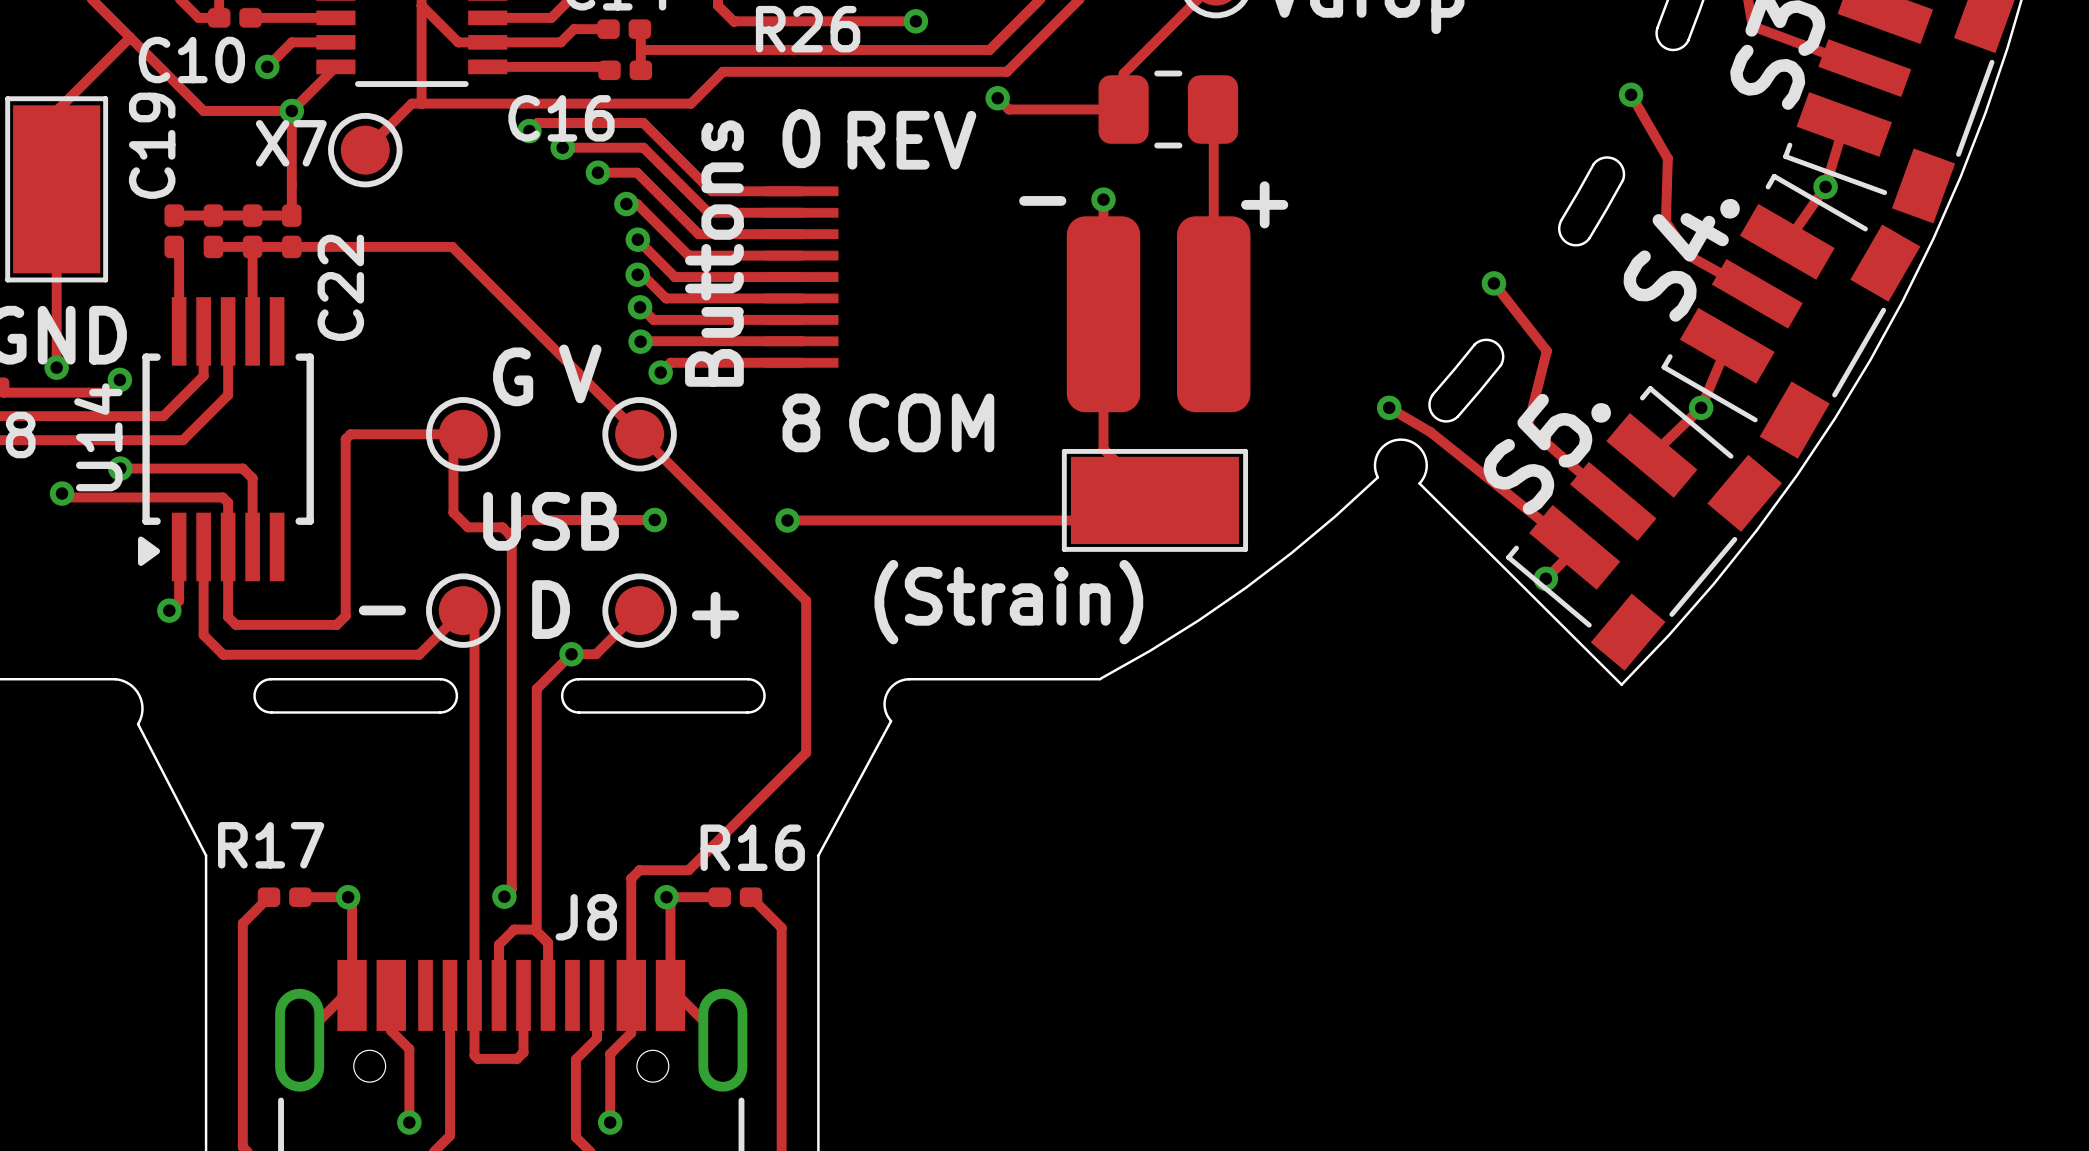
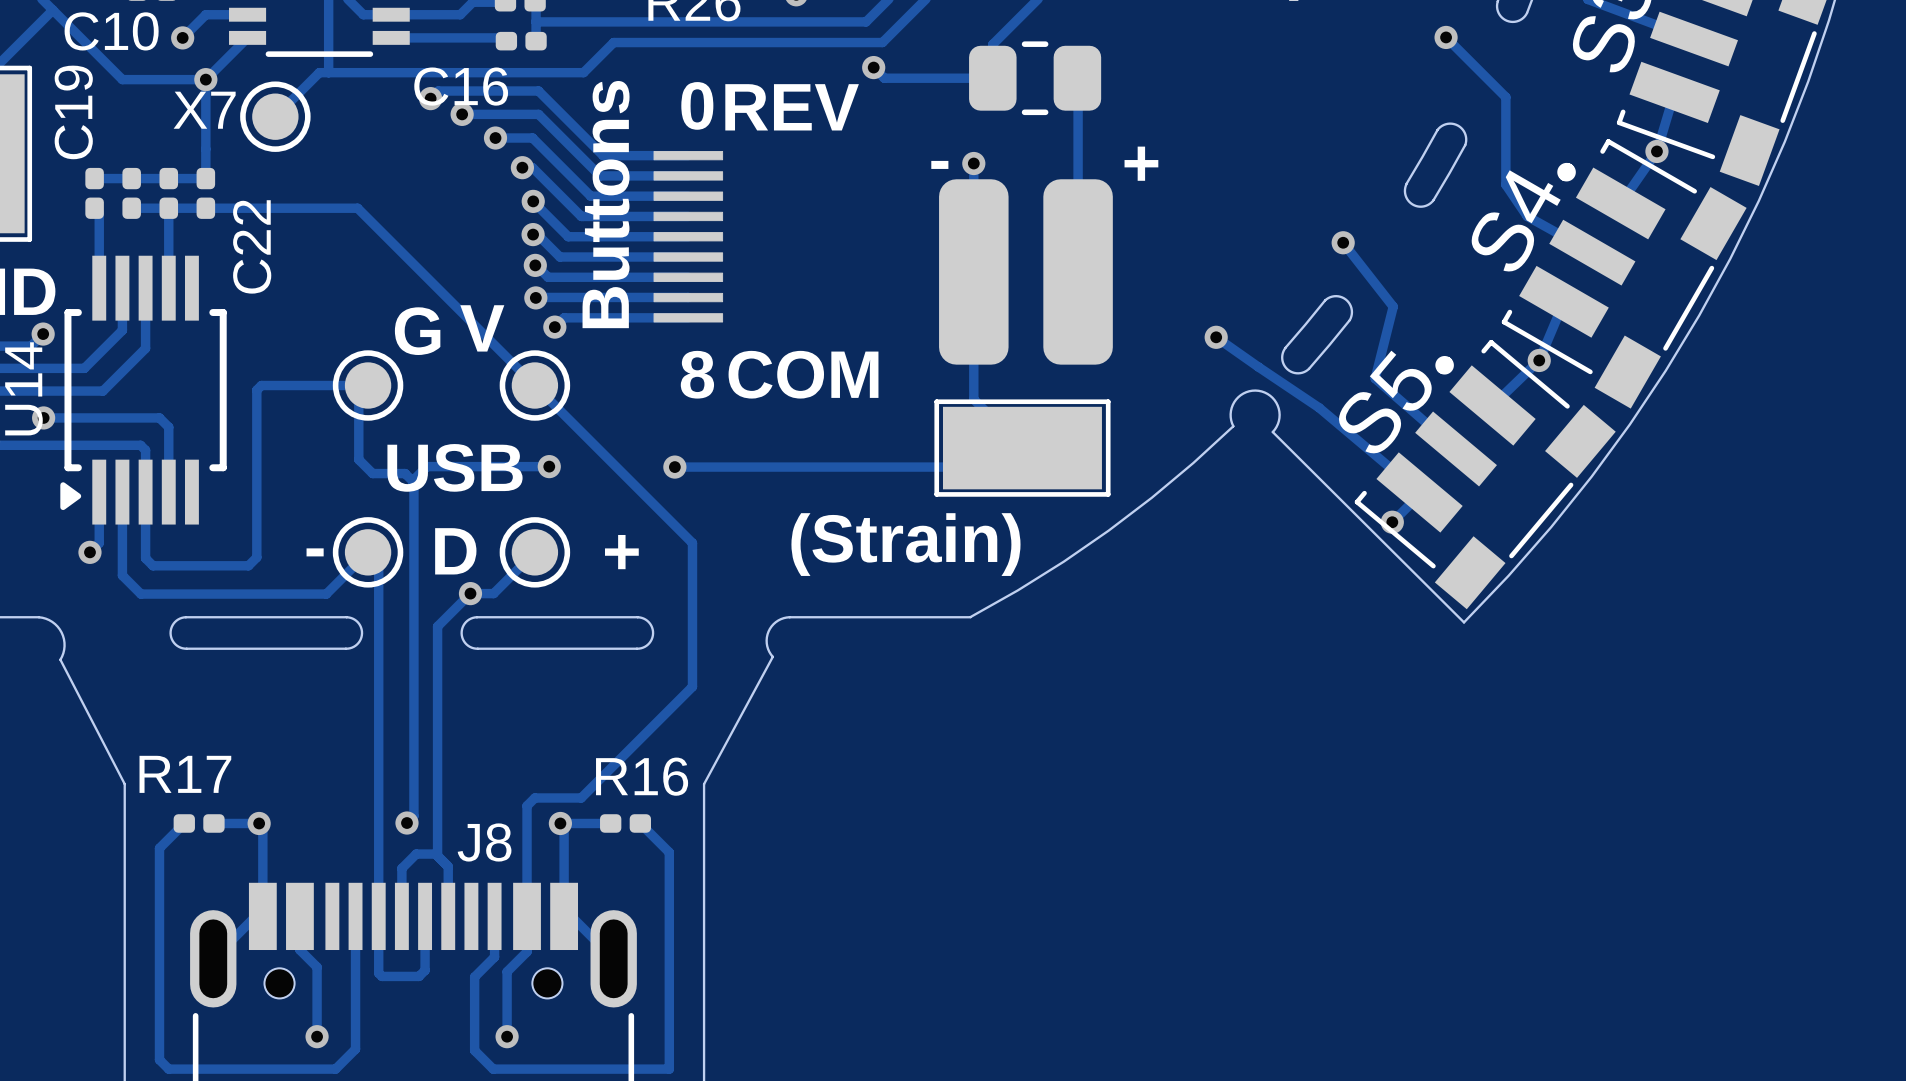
track: (1631, 94) (1667, 158) (1665, 222) -> (1446, 37) (1505, 97) (1505, 184)
via position: (1631, 94) -> (1446, 37)
track: (1389, 407) (1430, 432) (1574, 547) -> (1216, 337) (1319, 407) (1419, 492)
via position: (1389, 407) -> (1216, 337)

